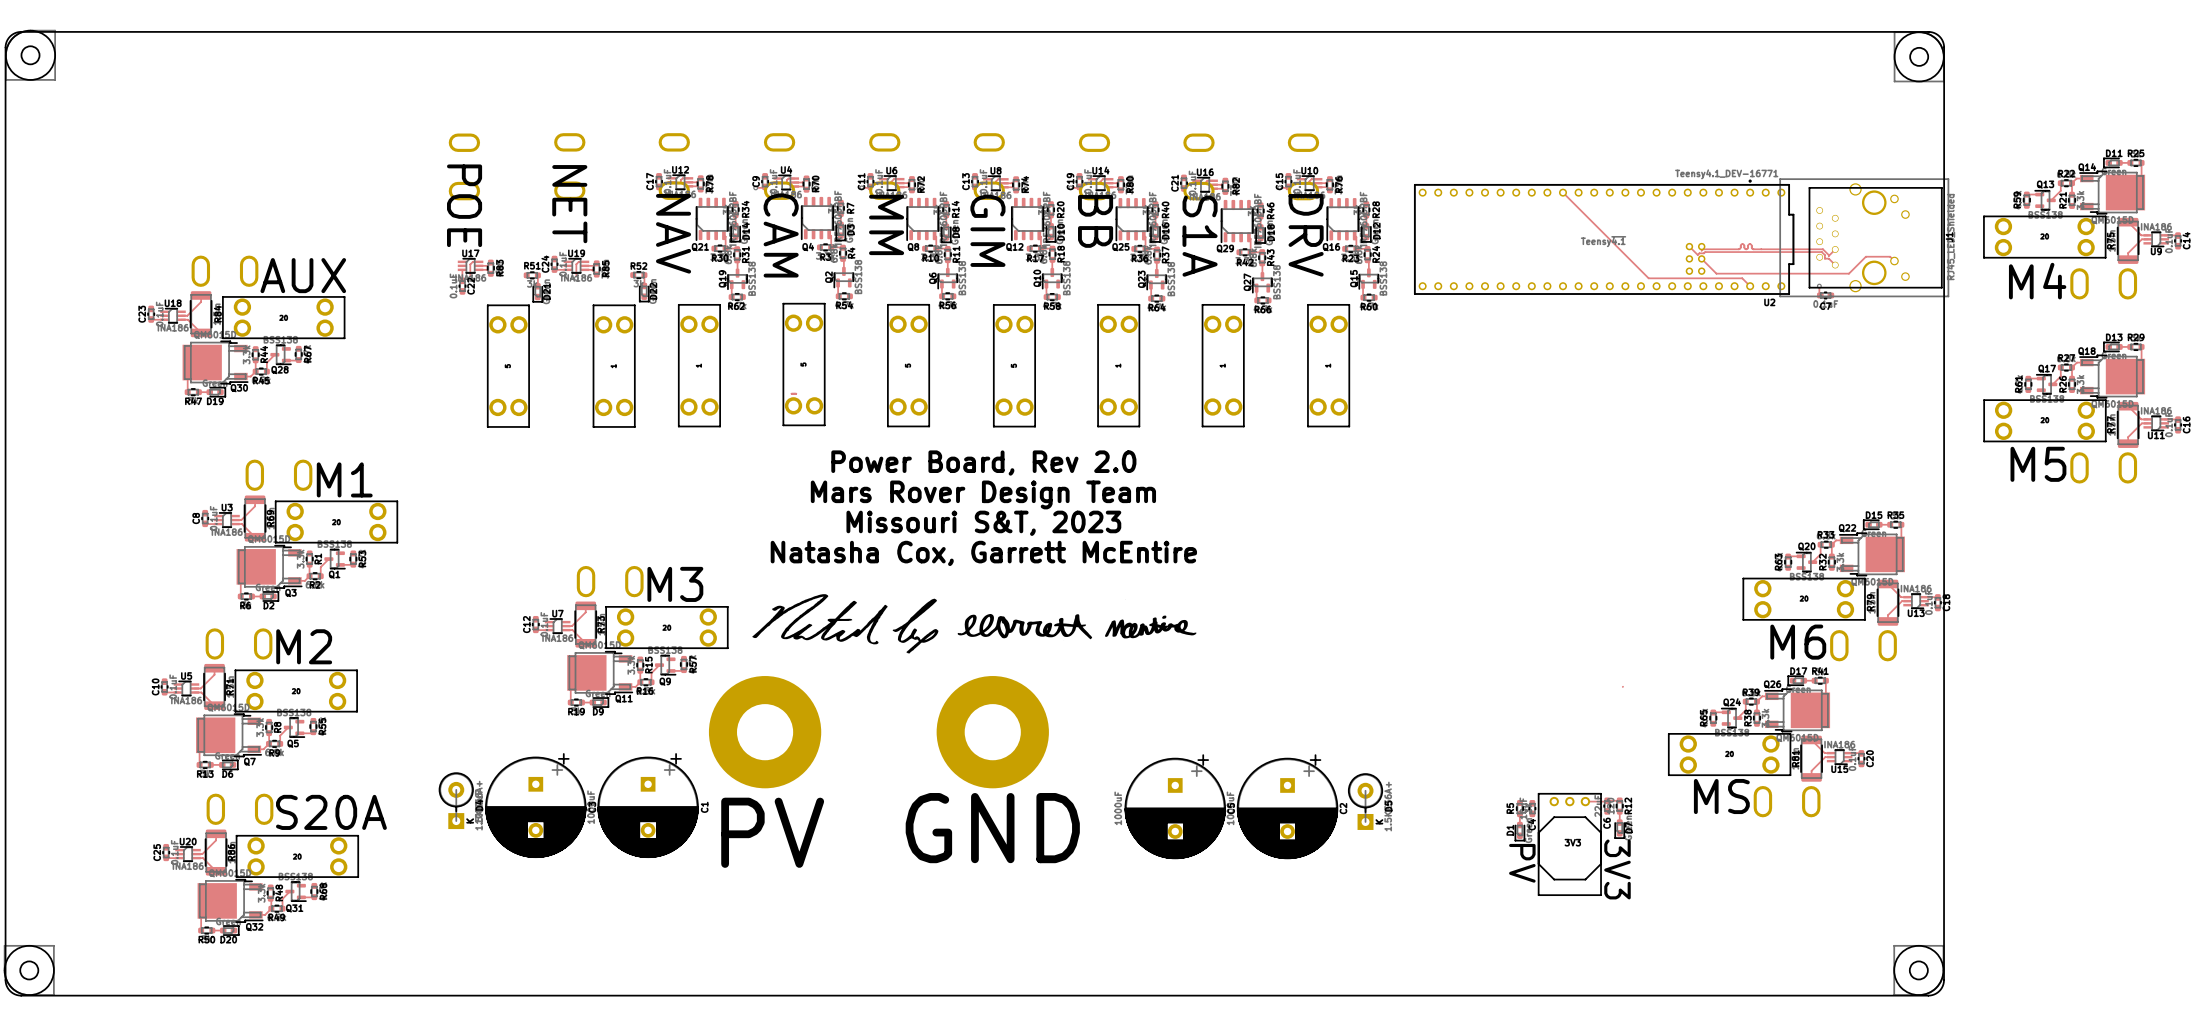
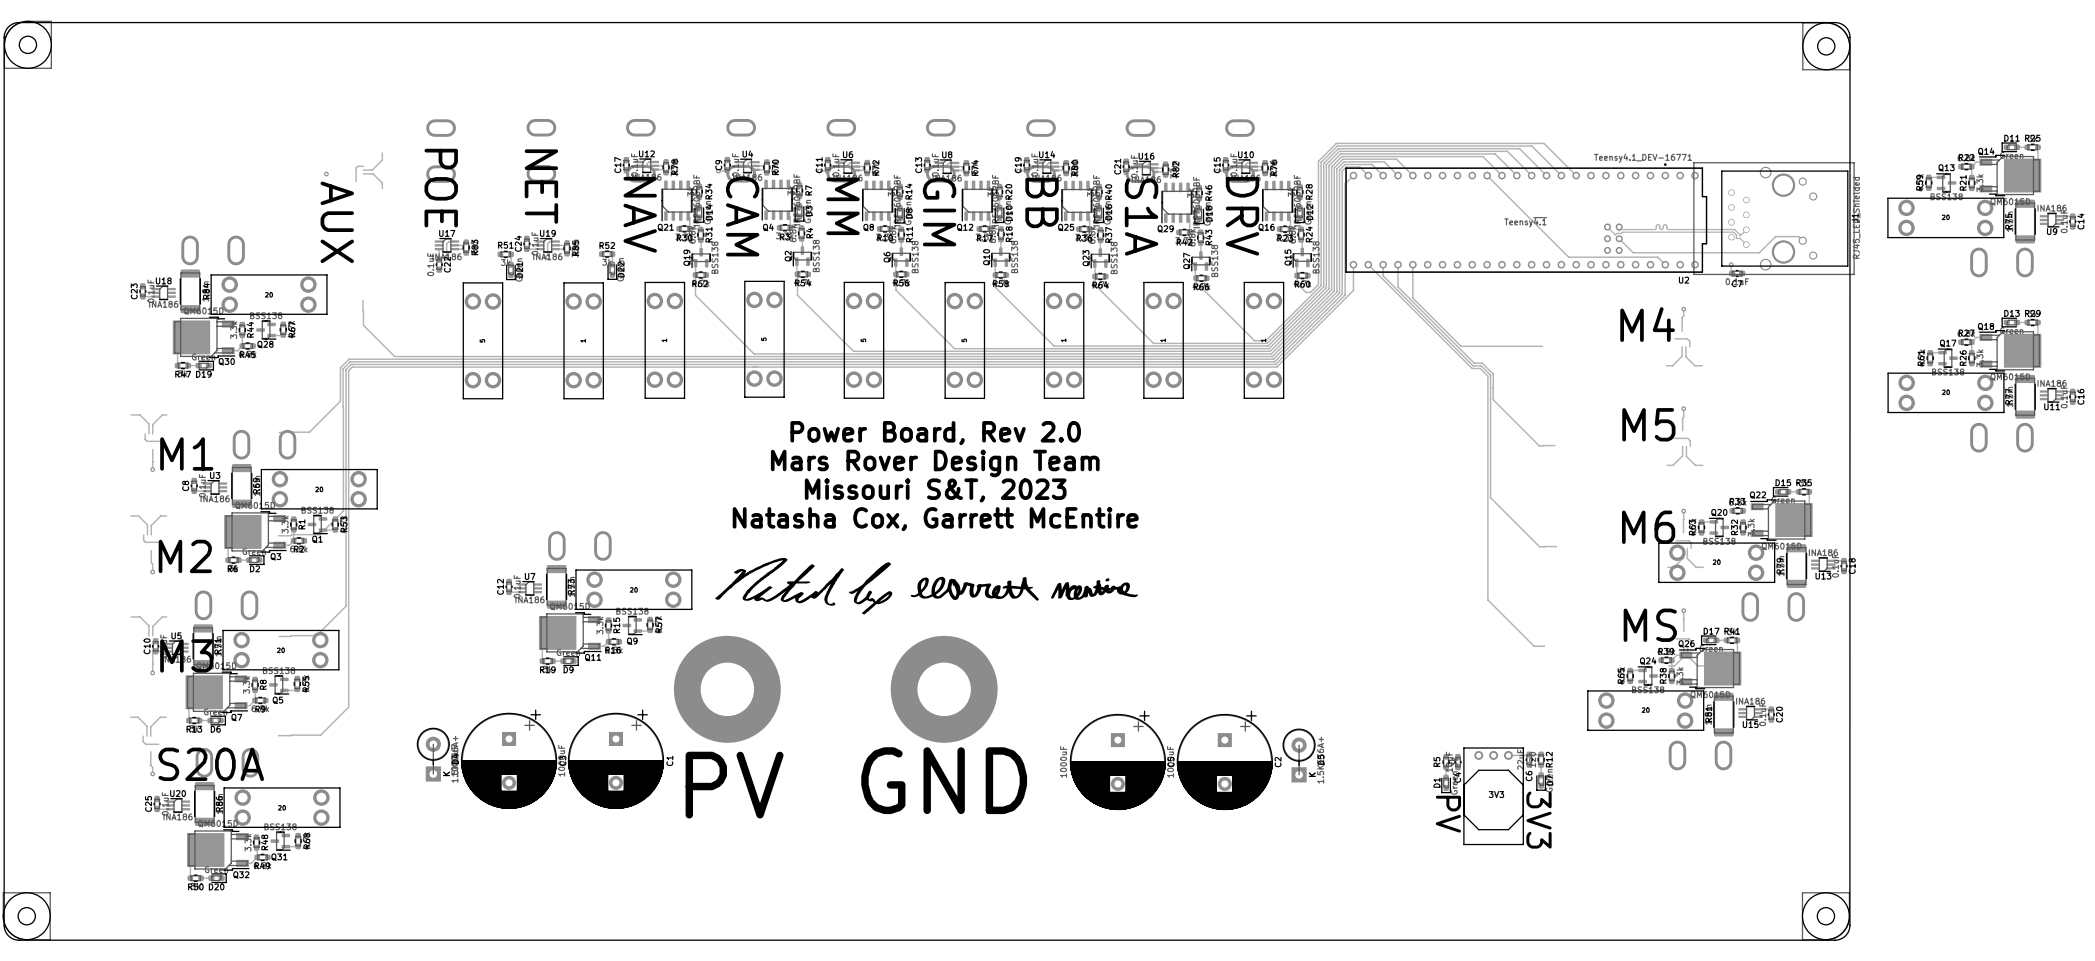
track: none -> (382, 153) (382, 160) (372, 170) (363, 170)
track: none -> (363, 166) (356, 168) (356, 181)
track: (2060, 183) (2060, 190) (2051, 200) -> none
via: none -> (326, 174)
track: none -> (363, 173) (373, 173) (382, 183) (382, 188)
track: none -> (1353, 175) (1345, 183) (1345, 295) (1275, 364) (351, 364) (345, 369) (346, 606) (316, 635) (279, 636)
track: none -> (1368, 175) (1359, 167) (1346, 167) (1342, 171) (1342, 294) (1274, 361) (350, 361) (343, 368) (343, 511) (319, 534) (278, 535)
track: none -> (1383, 175) (1372, 164) (1345, 164) (1339, 169) (1339, 293) (1273, 359) (349, 359) (340, 367) (340, 401) (309, 432) (279, 432)
track: none -> (1398, 175) (1384, 161) (1343, 161) (1336, 168) (1336, 292) (1272, 356) (394, 356) (363, 325) (362, 300)
track: none -> (1412, 175) (1396, 159) (1342, 159) (1334, 167) (1334, 291) (1271, 353) (754, 353) (695, 295) (695, 275)
track: none -> (1501, 175) (1482, 156) (1341, 156) (1331, 166) (1331, 289) (1270, 351) (853, 351) (797, 295) (797, 274)
track: none -> (1516, 175) (1495, 153) (1340, 153) (1328, 165) (1328, 288) (1269, 348) (954, 348) (895, 290) (895, 274)
track: none -> (1531, 175) (1507, 151) (1339, 151) (1326, 164) (1326, 287) (1268, 346) (1054, 346) (995, 287) (995, 275)
track: none -> (1546, 175) (1519, 148) (1338, 148) (1323, 163) (1323, 286) (1266, 343) (1153, 343) (1094, 284) (1094, 276)
track: none -> (1561, 175) (1531, 146) (1337, 146) (1321, 162) (1321, 285) (1265, 340) (1254, 340) (1196, 282) (1196, 278)
track: none -> (1576, 175) (1544, 143) (1336, 143) (1318, 161) (1318, 284) (1310, 292) (1306, 292) (1297, 283) (1297, 275)
track: (2128, 222) (2141, 235) (2148, 235) -> none
track: (2148, 239) (2141, 239) (2128, 253) (2128, 259) -> none
text rotation: 0° (303, 275) -> 90° clockwise (337, 222)
text: M4 (2037, 281) -> none
track: none -> (1353, 264) (1353, 290) (1276, 367) (757, 367)
track: none -> (1368, 264) (1472, 368) (1480, 368) (1487, 376) (1487, 600) (1534, 646) (1544, 646)
track: none -> (1383, 264) (1383, 275) (1473, 365) (1481, 365) (1490, 375) (1490, 497) (1539, 546) (1556, 546)
track: none -> (1398, 264) (1398, 286) (1474, 363) (1482, 363) (1493, 374) (1493, 399) (1539, 445) (1554, 445)
track: none -> (1412, 264) (1412, 298) (1461, 346) (1542, 346)
track: (201, 295) (201, 301) (187, 315) (181, 315) -> none
track: (181, 319) (187, 319) (201, 332) -> none
track: none -> (1683, 309) (1682, 331)
via: none -> (1683, 309)
text: none -> M4 (1647, 324)
track: (274, 354) (266, 362) (266, 371) -> none
track: none -> (1674, 338) (1687, 338) (1689, 341) (1689, 346)
track: (2060, 367) (2060, 376) (2052, 384) -> none
track: none -> (1682, 346) (1682, 356) (1672, 365) (1666, 365)
track: none -> (1685, 346) (1685, 356) (1694, 365) (1702, 365)
track: none -> (752, 367) (352, 367) (348, 370) (348, 707) (320, 735) (278, 735)
track: (2128, 406) (2141, 419) (2148, 419) -> none
track: (2148, 423) (2141, 423) (2128, 437) (2128, 443) -> none
track: none -> (1683, 408) (1682, 430)
via: none -> (1683, 408)
track: none -> (131, 414) (140, 414) (148, 423) (148, 433)
track: none -> (166, 414) (162, 414) (152, 424) (152, 433)
text: none -> M5 (1648, 424)
track: none -> (145, 433) (147, 441) (161, 441)
text: M5 (2038, 464) -> none
track: none -> (1674, 438) (1687, 438) (1690, 440) (1690, 446)
track: none -> (1682, 446) (1682, 455) (1673, 465) (1667, 465)
track: none -> (1686, 446) (1686, 456) (1695, 465) (1702, 465)
text position: M1 (344, 479) -> M1 (186, 453)
track: none -> (152, 449) (152, 469)
track: (255, 499) (255, 506) (241, 520) (235, 520) -> none
via: none -> (152, 469)
track: (235, 524) (241, 524) (255, 537) -> none
track: (1846, 540) (1836, 540) (1831, 544) (1831, 556) -> none
track: (1820, 544) (1820, 554) (1812, 562) -> none
track: none -> (1683, 511) (1683, 532)
via: none -> (1683, 511)
track: none -> (130, 515) (138, 515) (147, 524) (147, 534)
track: none -> (166, 515) (160, 515) (151, 525) (151, 534)
track: (328, 559) (320, 567) (320, 576) -> none
track: none -> (143, 534) (145, 542) (158, 542)
track: none -> (1676, 540) (1689, 540) (1691, 548)
text: M3 (675, 584) -> none
track: none -> (1683, 548) (1683, 557) (1673, 567) (1668, 567)
track: none -> (1687, 548) (1687, 558) (1696, 567) (1703, 567)
track: (1887, 584) (1901, 597) (1907, 597) -> none
track: none -> (151, 550) (152, 572)
track: (1907, 601) (1902, 601) (1887, 615) (1887, 621) -> none
track: (585, 605) (585, 612) (571, 626) (565, 626) -> none
via: none -> (152, 572)
track: (565, 630) (572, 630) (585, 643) -> none
text position: M6 (1798, 642) -> M6 (1648, 527)
text position: M2 (304, 646) -> M2 (185, 556)
track: none -> (1683, 610) (1683, 631)
via: none -> (1683, 610)
track: none -> (131, 616) (140, 616) (148, 625) (148, 635)
track: none -> (166, 616) (162, 616) (152, 626) (152, 635)
track: (659, 665) (651, 673) (651, 682) -> none
track: (214, 668) (214, 674) (200, 688) (194, 688) -> none
track: none -> (1676, 638) (1688, 638) (1691, 641) (1691, 646)
track: none -> (1683, 646) (1683, 656) (1674, 665) (1668, 665)
track: none -> (1687, 646) (1687, 655) (1697, 665) (1704, 665)
track: none -> (152, 651) (152, 673)
track: (194, 692) (201, 692) (214, 705) -> none
text: none -> M3 (186, 655)
track: (1745, 701) (1745, 710) (1737, 718) -> none
via: none -> (152, 673)
track: (288, 727) (280, 735) (280, 743) -> none
track: (1811, 739) (1824, 753) (1831, 753) -> none
track: (1831, 757) (1825, 757) (1811, 770) (1811, 777) -> none
track: none -> (130, 717) (138, 717) (146, 726) (146, 736)
track: none -> (166, 717) (160, 717) (150, 726) (150, 736)
track: none -> (143, 736) (143, 741) (145, 744) (158, 744)
text position: MS (1721, 796) -> MS (1650, 625)
track: none -> (150, 751) (150, 765) (152, 767) (152, 773)
text position: S20A (331, 812) -> S20A (211, 764)
via: none -> (152, 773)
track: (216, 833) (216, 840) (202, 854) (196, 854) -> none
track: (196, 858) (202, 858) (216, 871) -> none
track: (289, 891) (282, 898) (282, 908) -> none

